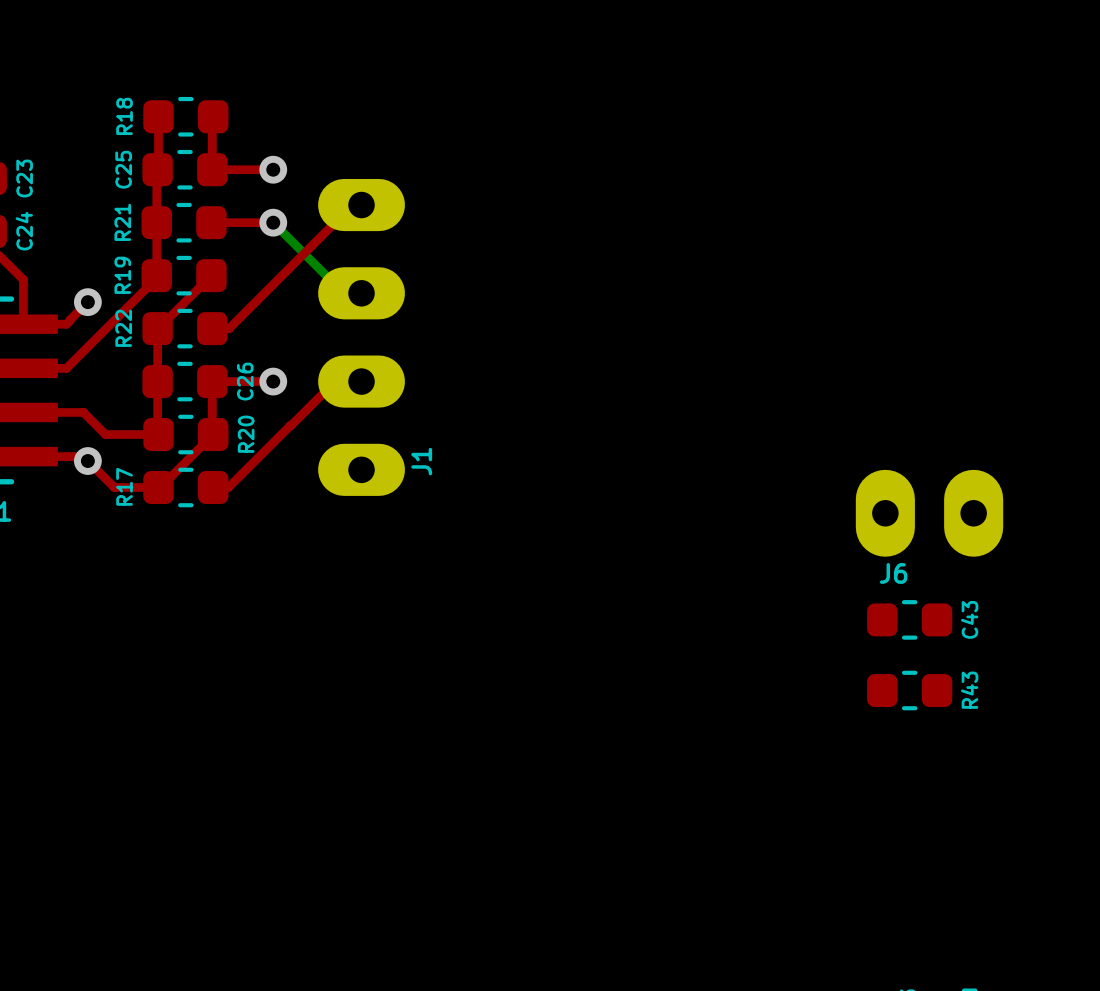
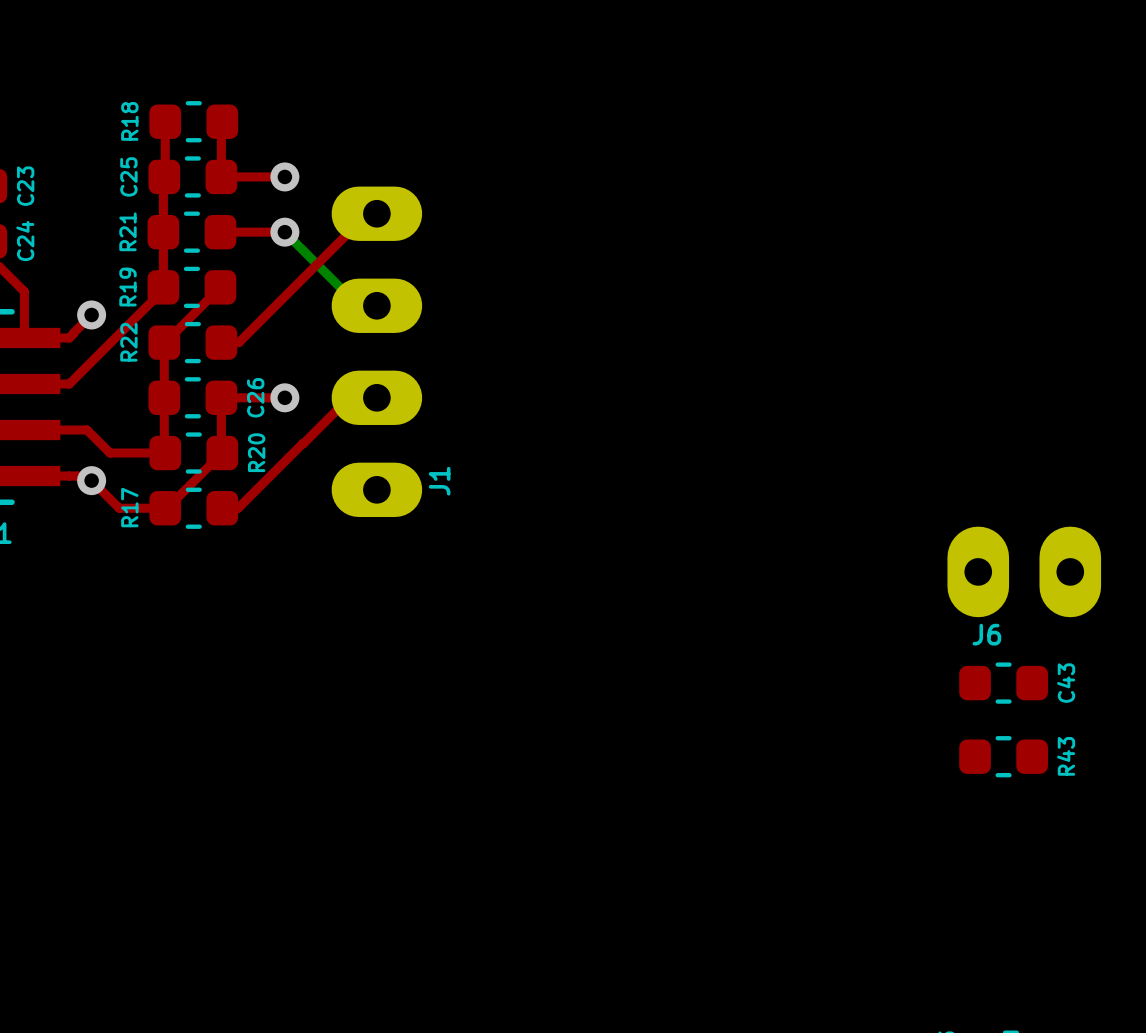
J6 position: (929, 513) -> (1024, 571)
C43 position: (909, 619) -> (1003, 683)
R43 position: (909, 690) -> (1003, 756)

